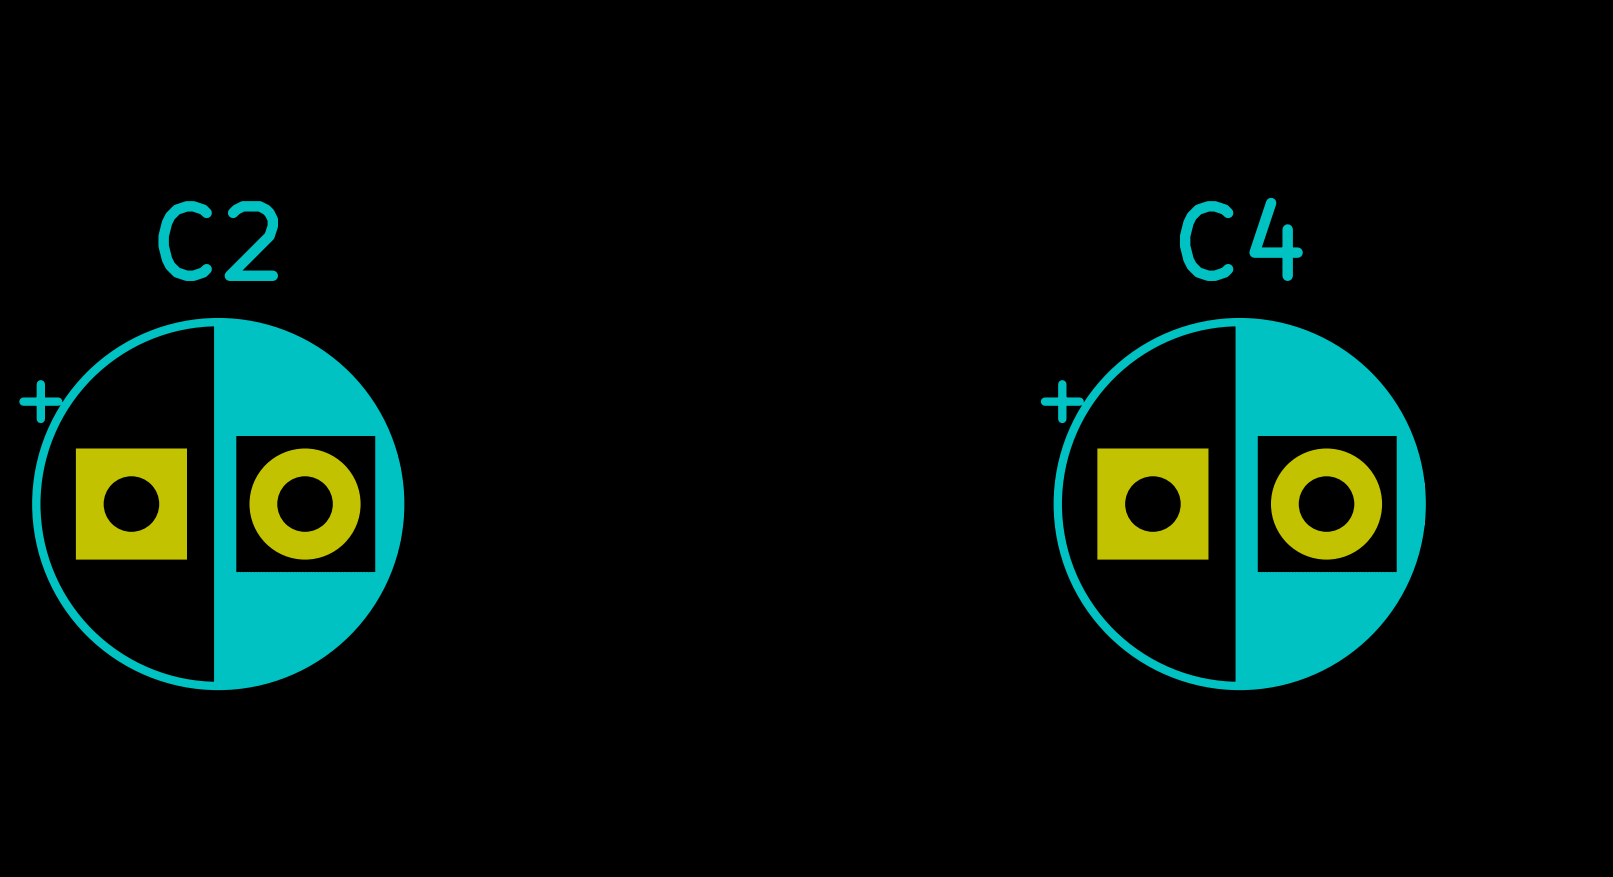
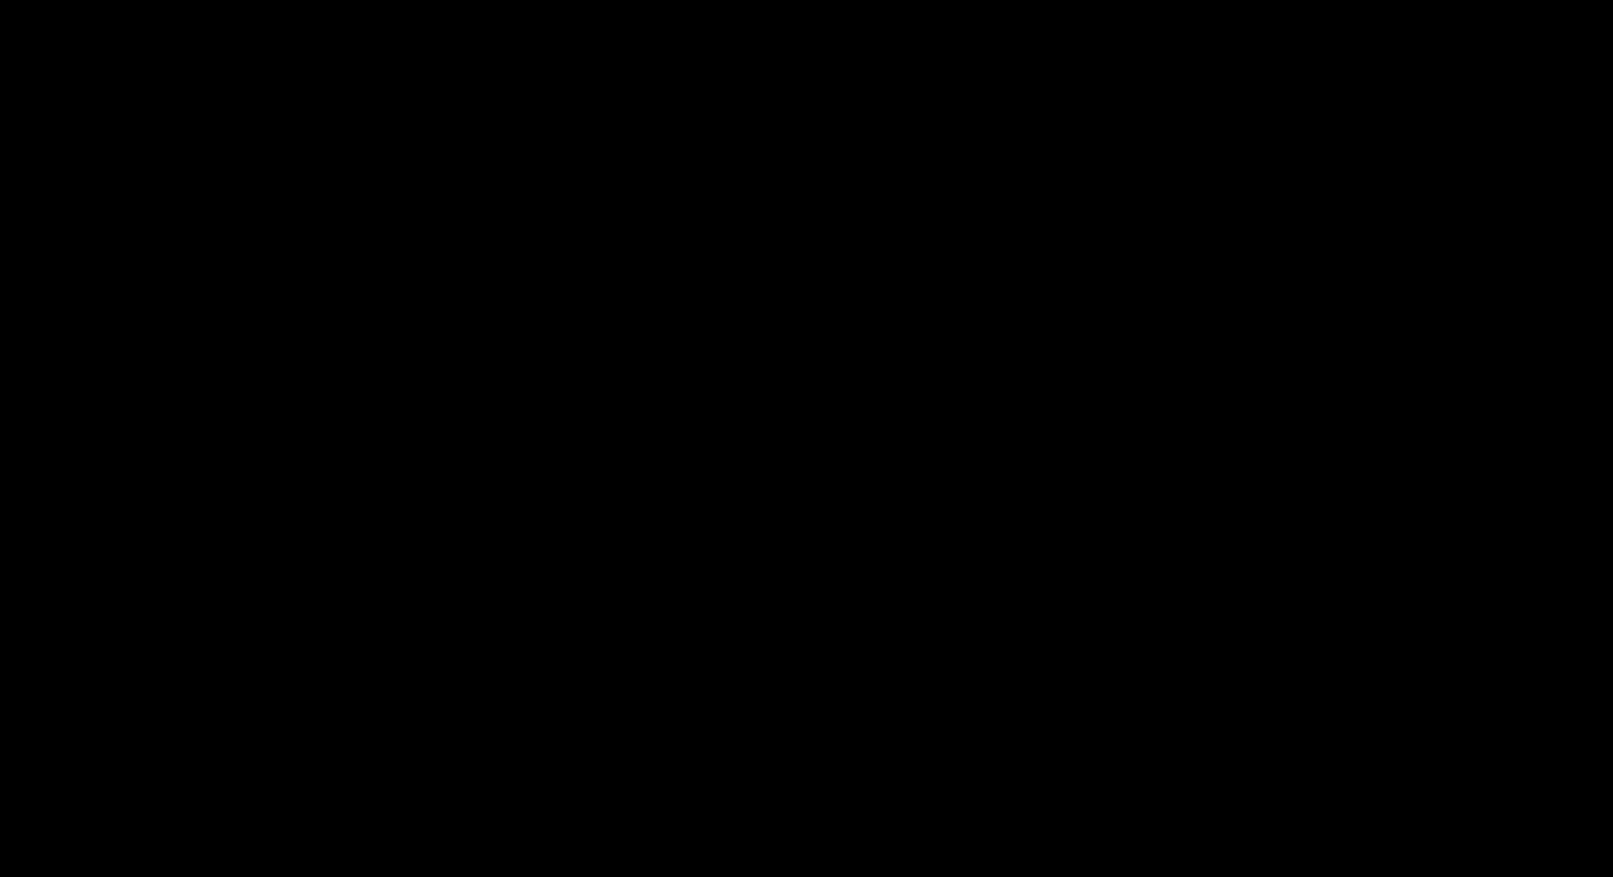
C2: (211, 504) -> none
C4: (1233, 504) -> none

